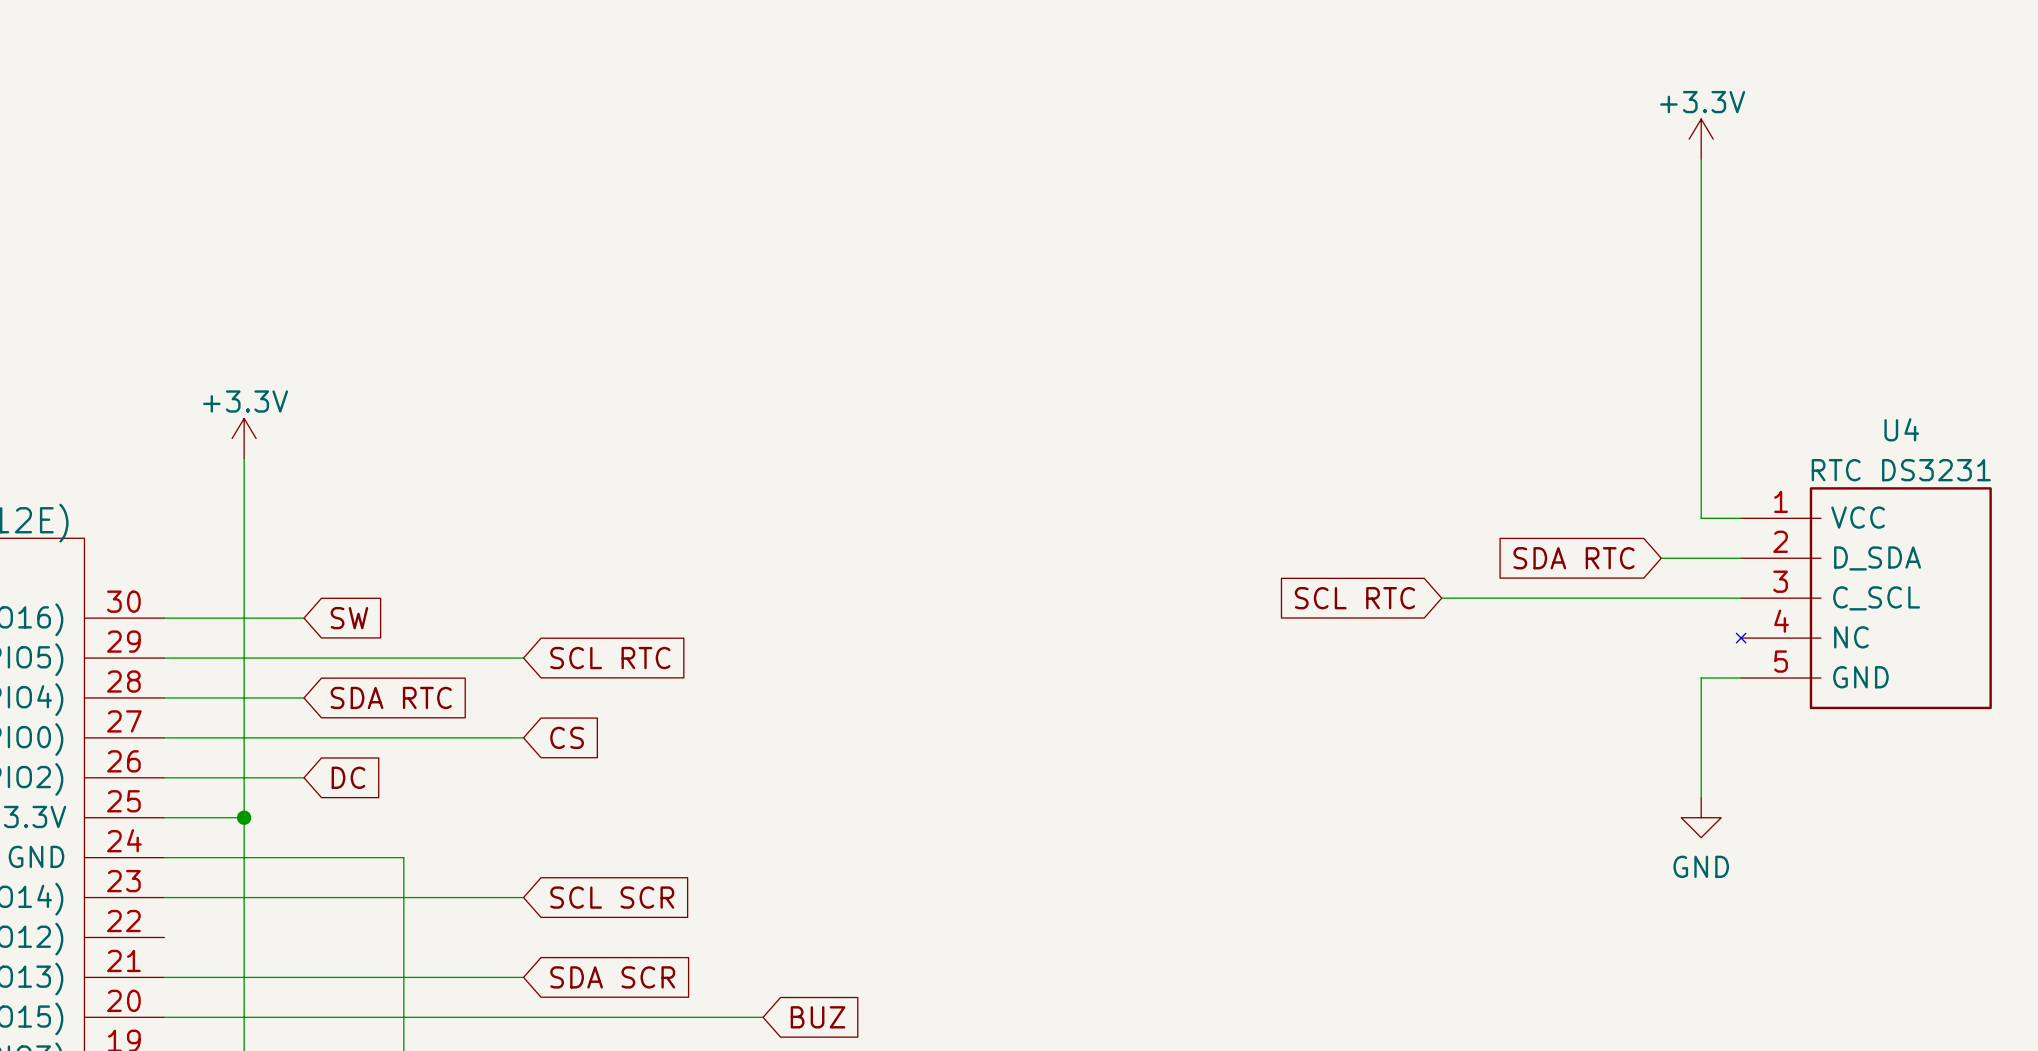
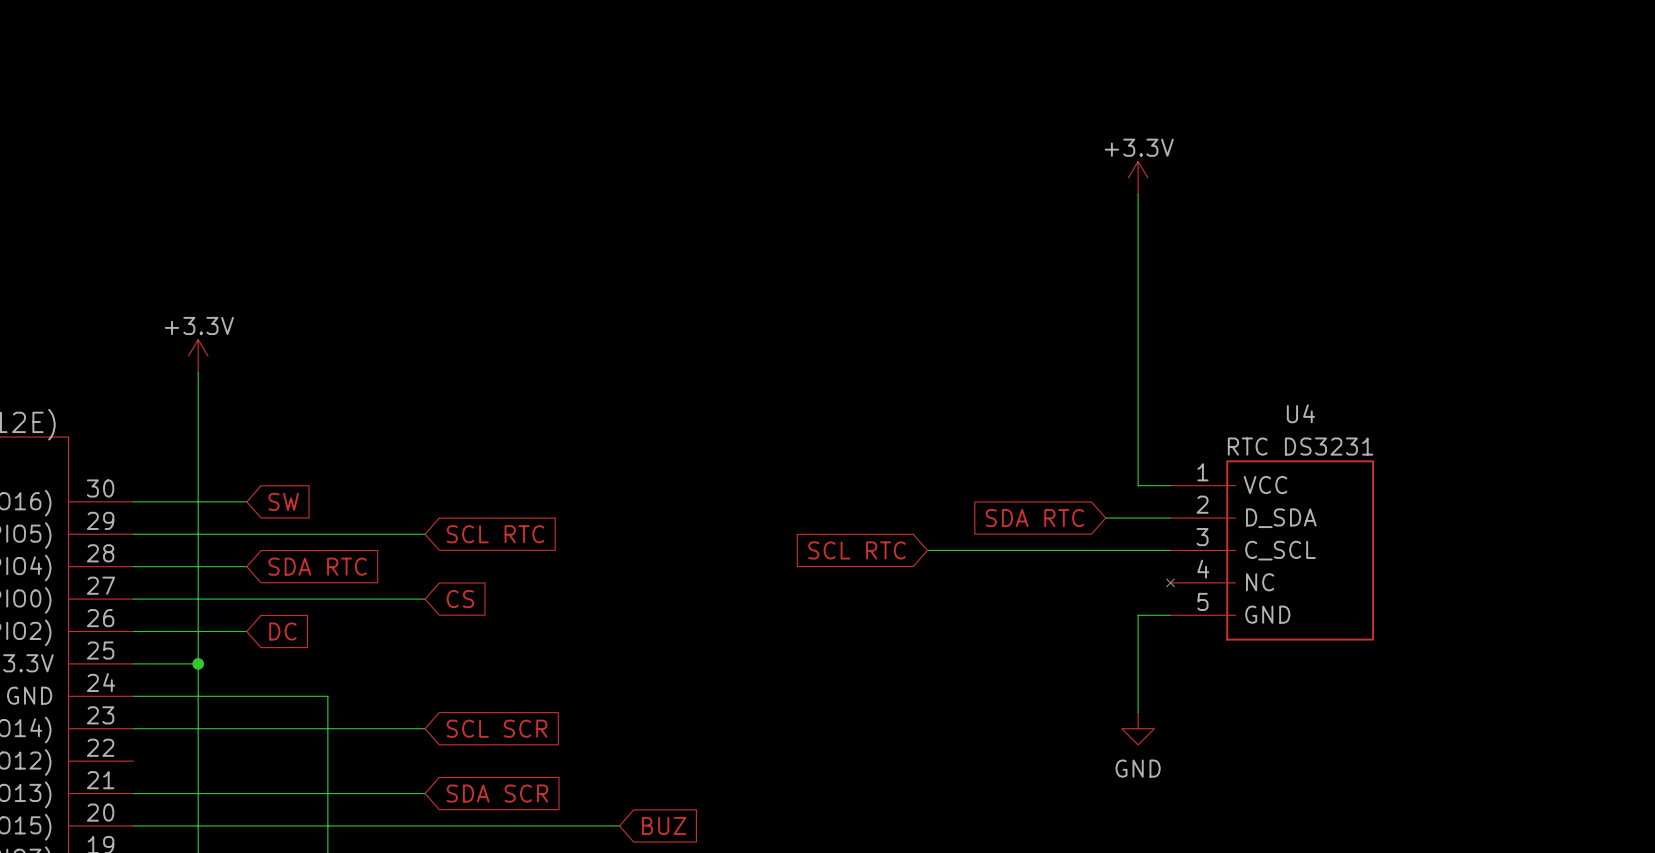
power symbol position: +3.3V (1701, 139) -> +3.3V (1138, 177)
wire: (1701, 159) (1701, 518) (1741, 518) -> none
global label position: SDA RTC (1574, 558) -> SDA RTC (1034, 518)
wire: (1661, 558) (1741, 558) -> (1105, 518) (1170, 518)
global label position: SCL RTC (1354, 598) -> SCL RTC (857, 550)
wire: (1441, 598) (1741, 598) -> (1170, 485) (1138, 485) (1138, 193)
U4 position: (1864, 598) -> (1270, 550)
wire: none -> (927, 550) (1170, 550)
wire: (1741, 678) (1701, 678) (1701, 797) -> (1170, 615) (1138, 615) (1138, 712)
power symbol position: GND (1701, 817) -> GND (1138, 728)

